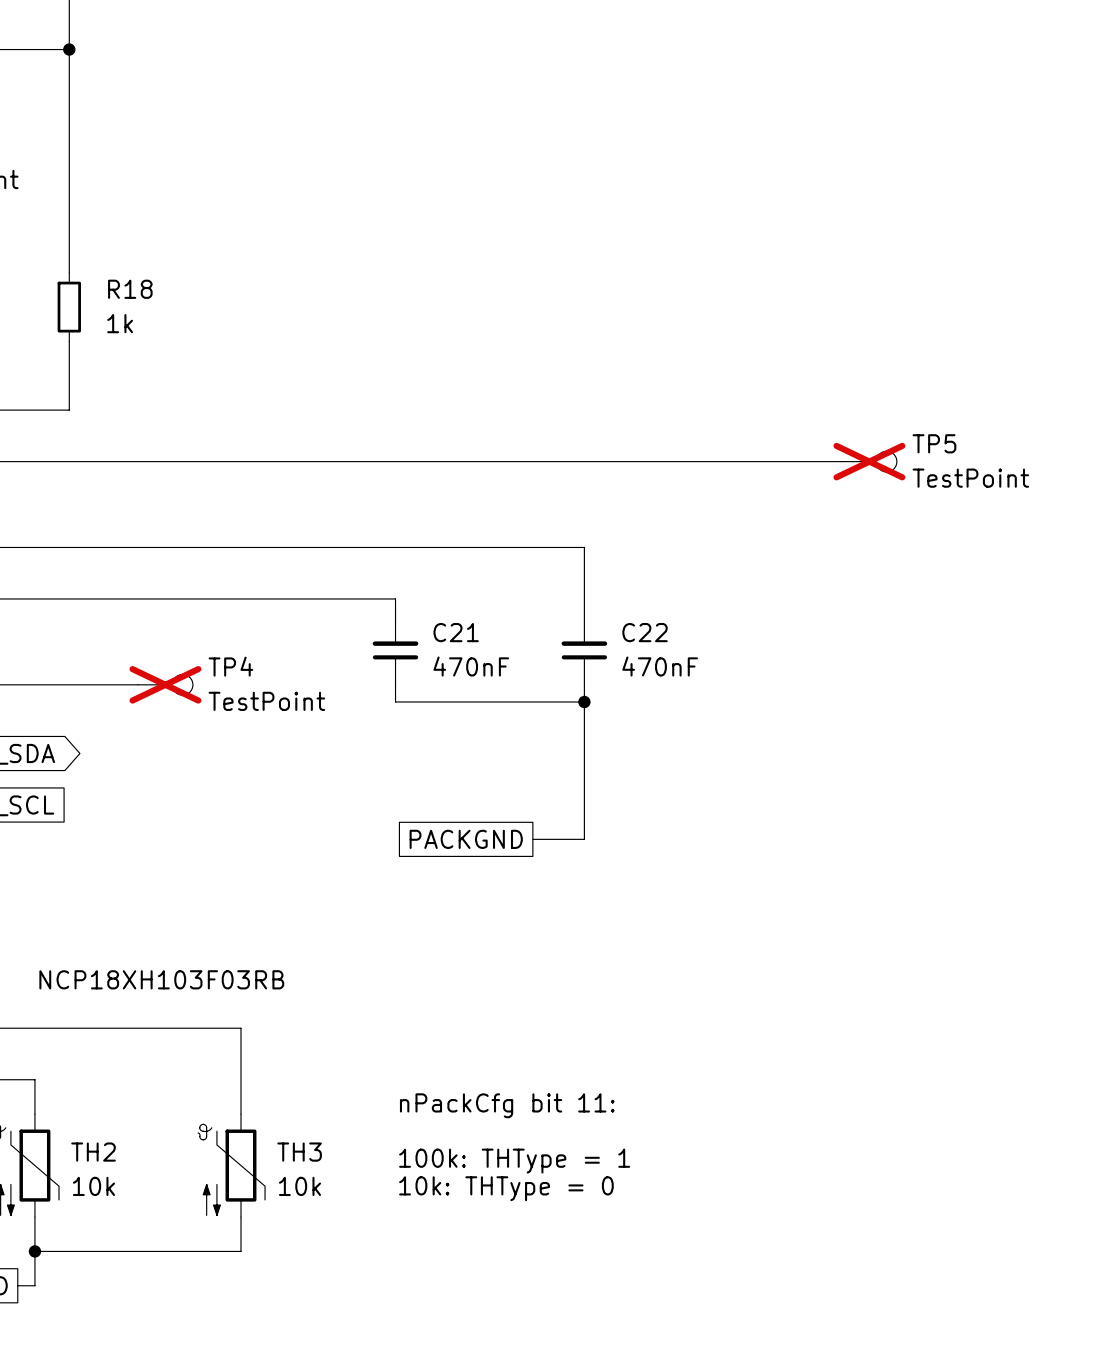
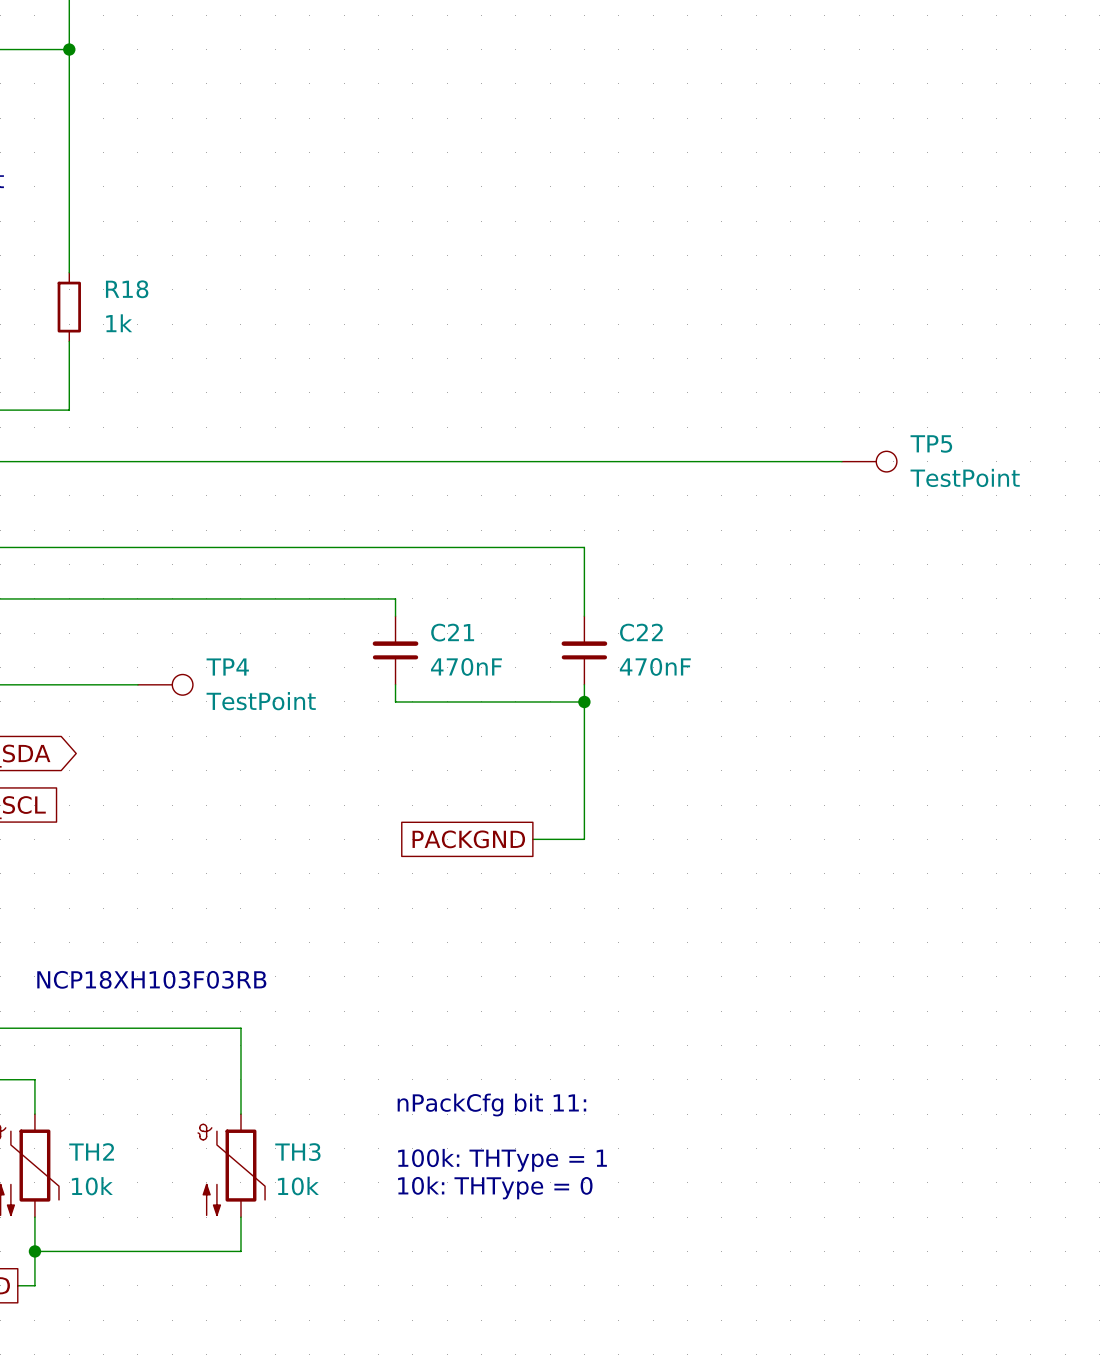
TP5 do-not-place cross: (869, 461) -> none
TP4 do-not-place cross: (165, 684) -> none

